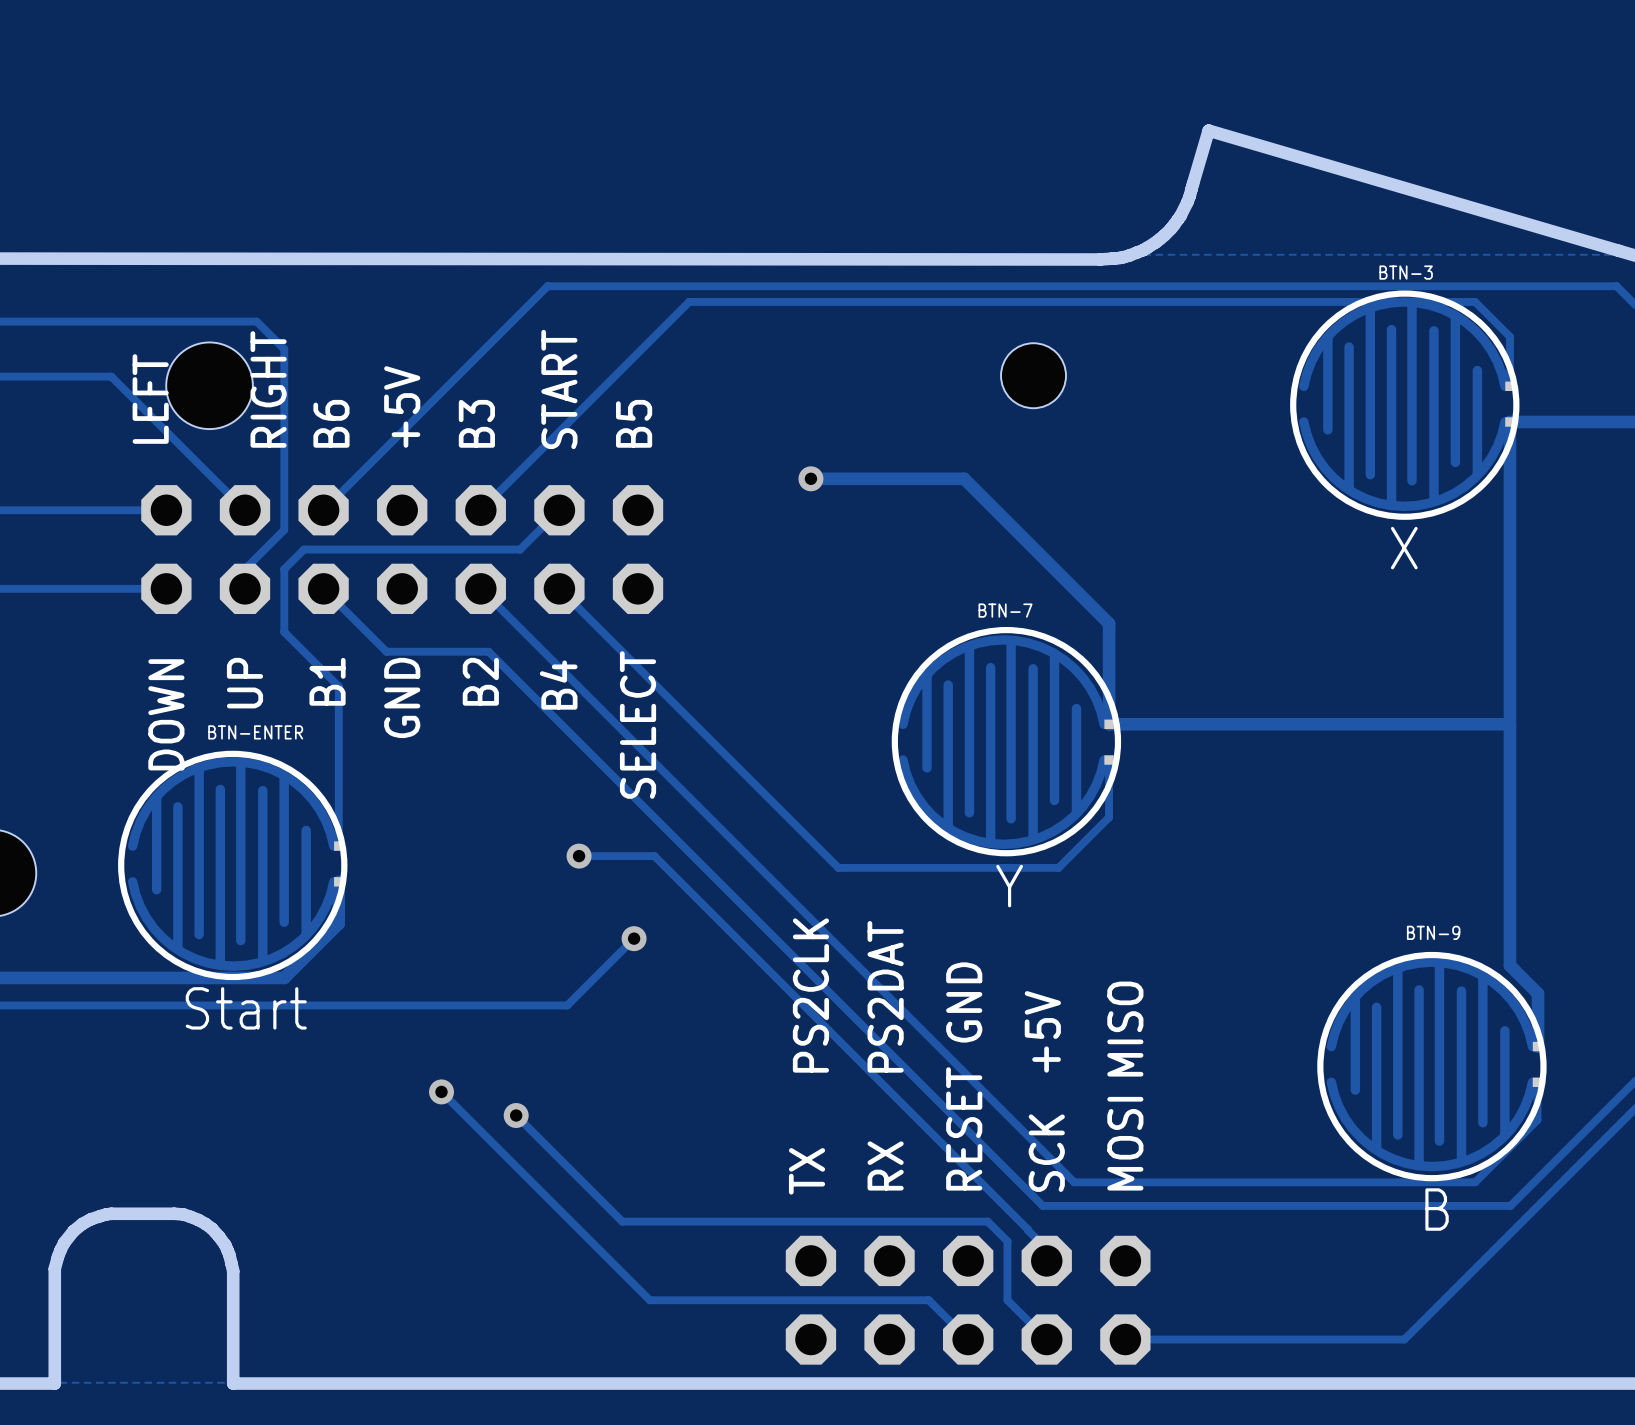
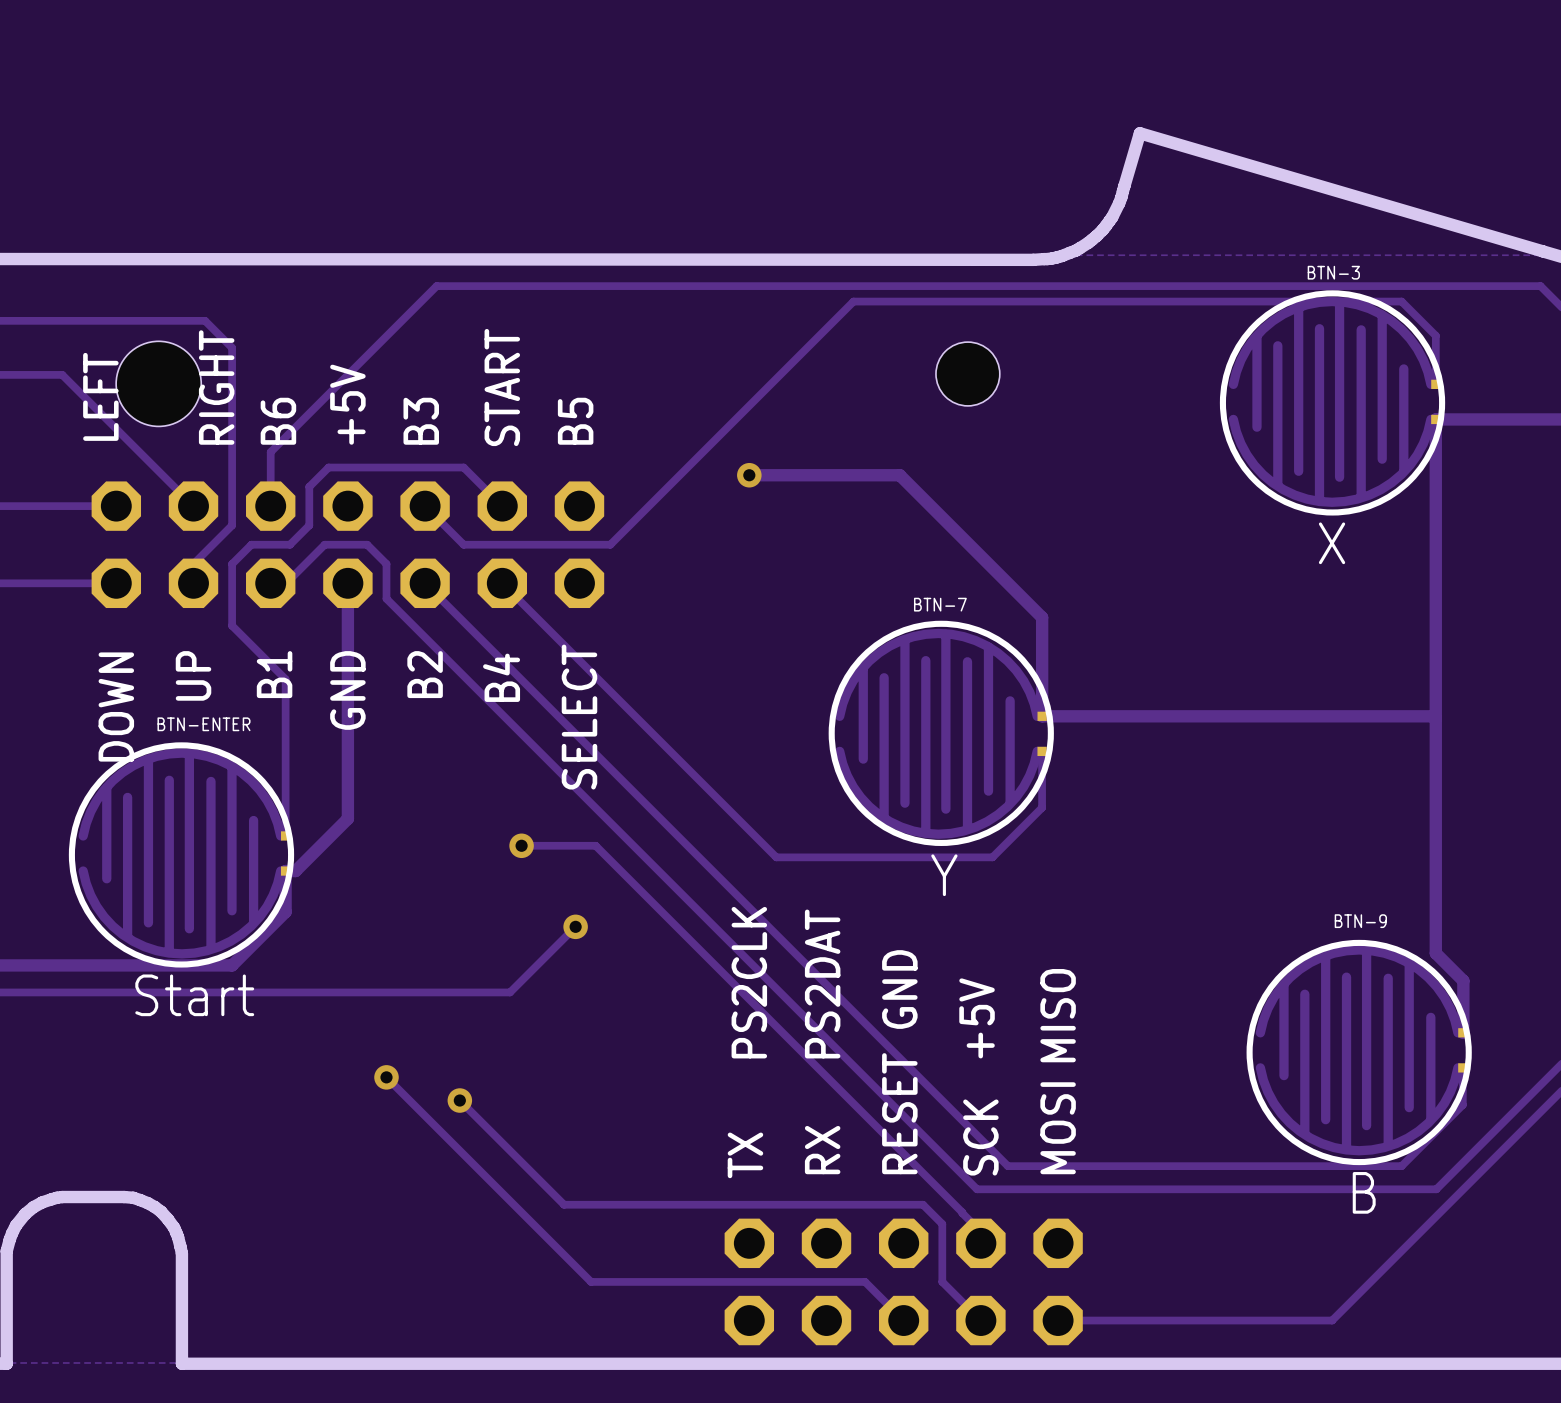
track: (547, 286) (323, 510) -> (490, 286) (436, 286) (270, 452) (270, 506)
track: (917, 301) (689, 301) (480, 510) -> (853, 301) (610, 544) (463, 544) (425, 506)
track: (559, 510) (520, 549) (421, 549) -> (502, 506) (463, 467) (328, 467) (309, 486) (309, 525) (290, 544)
track: (378, 549) (343, 549) -> (324, 544) (286, 583) (270, 583)
track: (323, 588) (386, 651) (488, 651) -> (367, 544) (386, 564) (386, 598) (432, 645)
track: none -> (347, 583) (347, 818) (295, 871) (285, 871)

